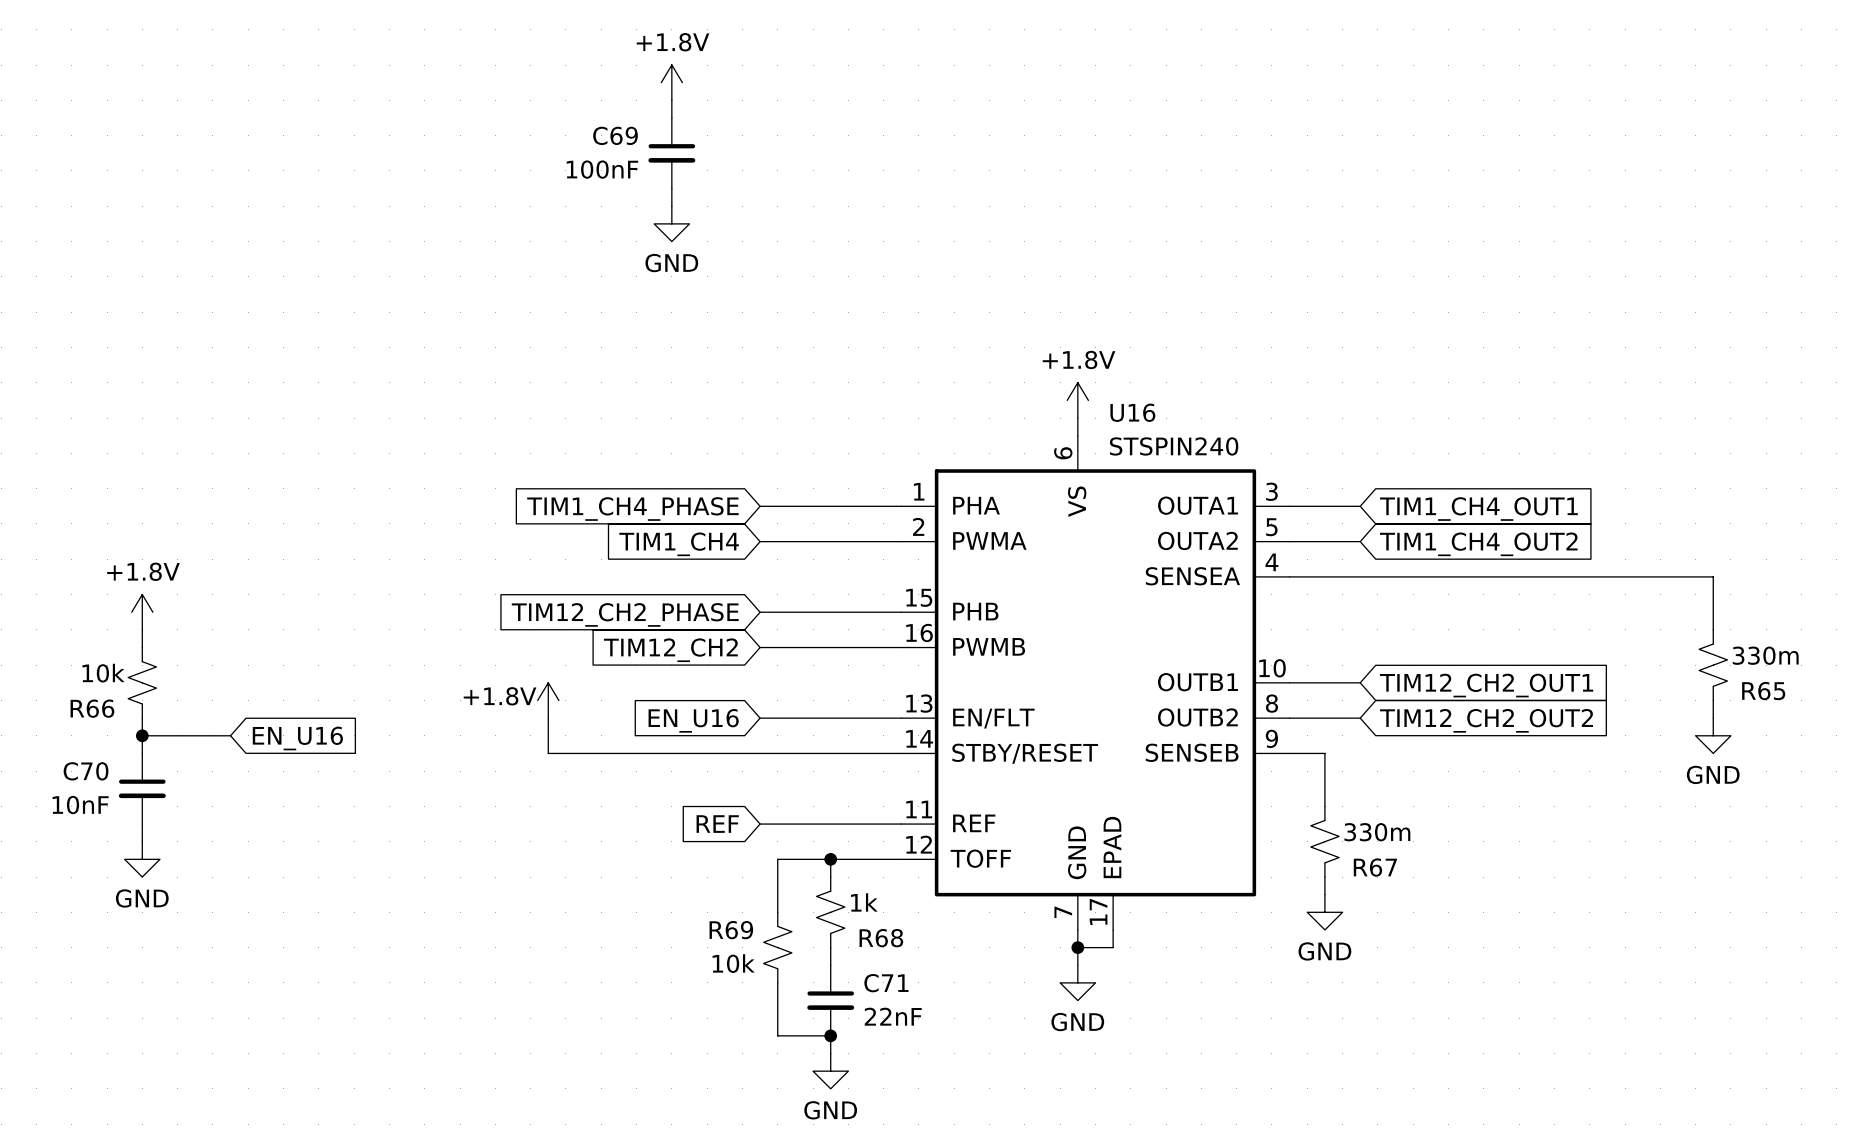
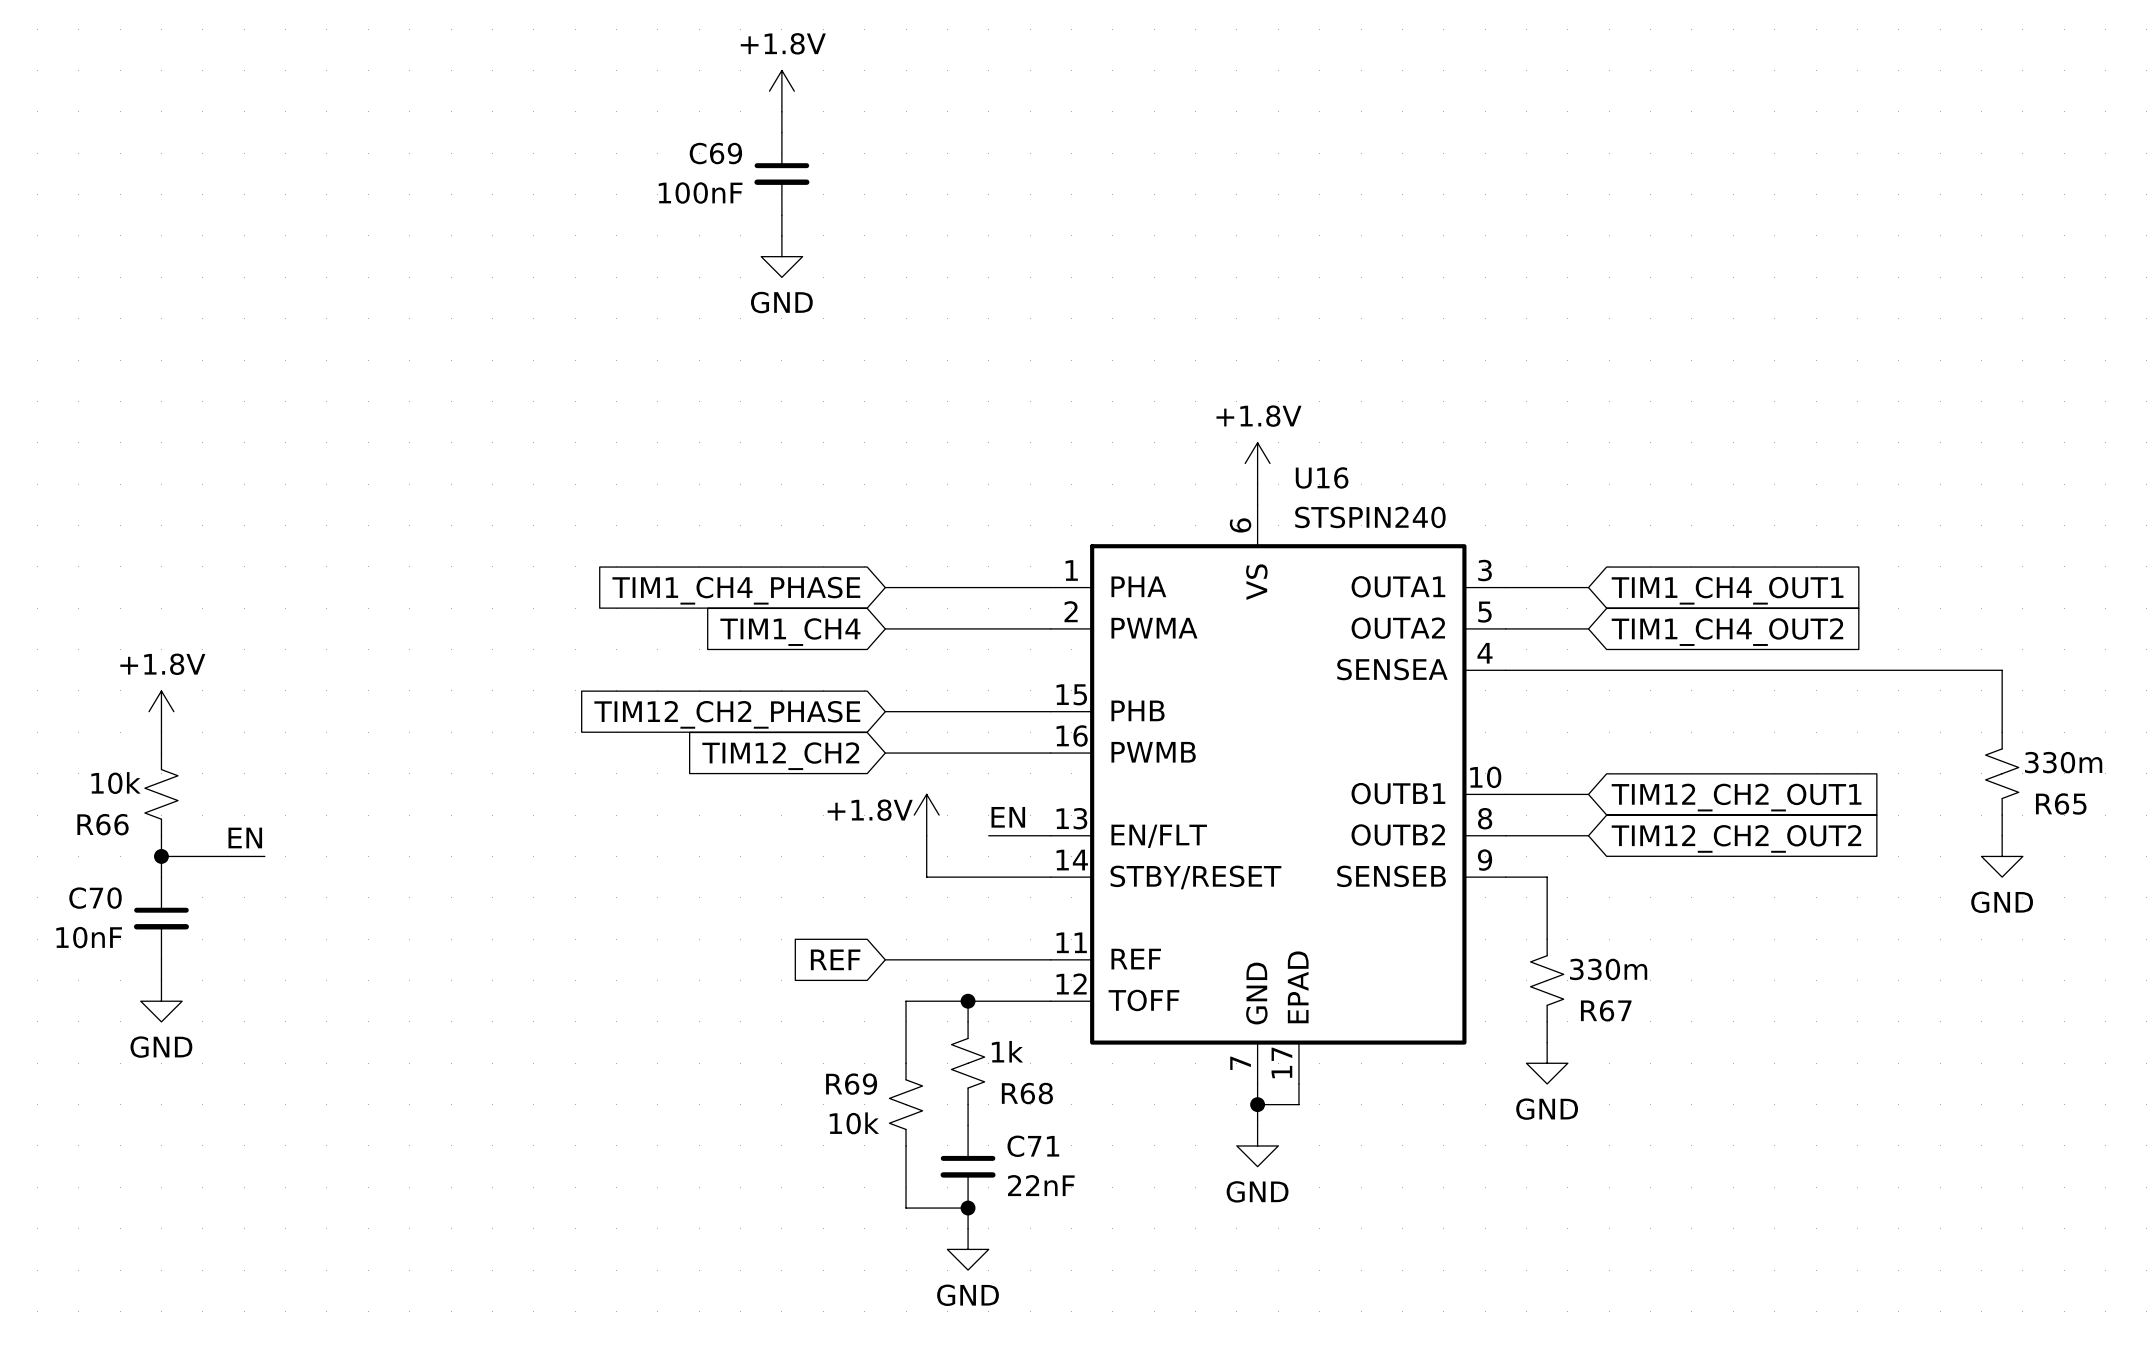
power symbol position: +1.8V (548, 700) -> +1.8V (926, 815)
label: none -> EN (1008, 817)
wire: (548, 718) (548, 753) (795, 753) -> (926, 835) (926, 877)
wire: (760, 718) (848, 718) -> none
label: none -> EN (245, 837)
global label: EN_U16 (693, 720) -> none
global label: EN_U16 (297, 738) -> none

